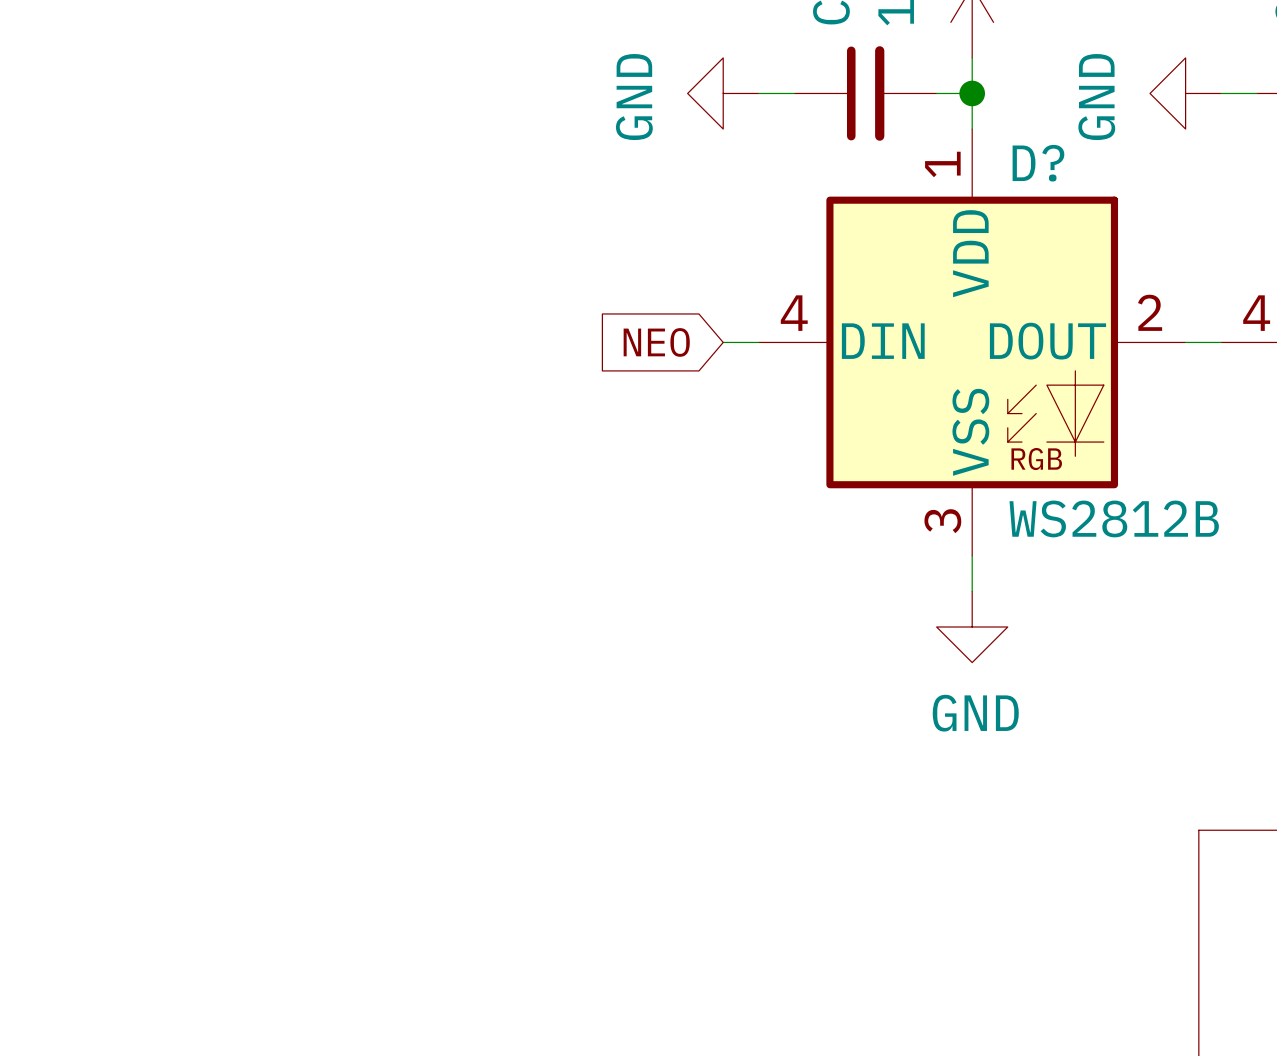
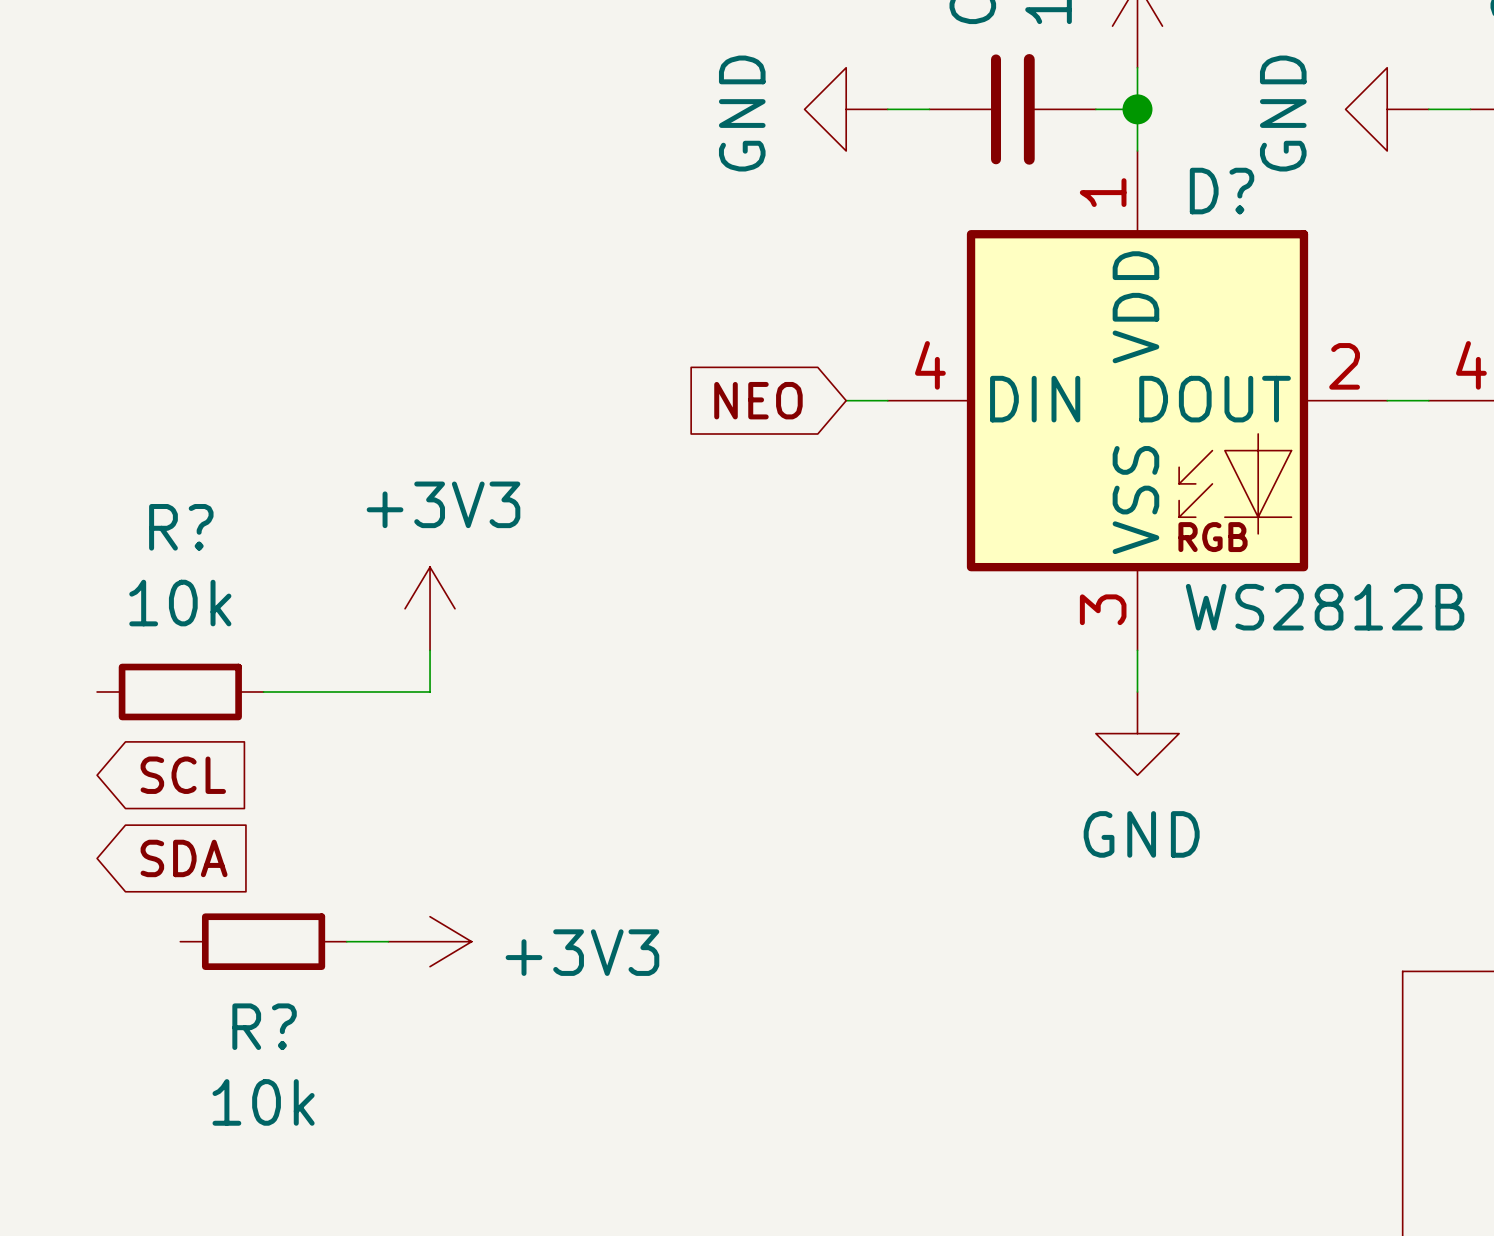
power symbol: none -> +3V3 (430, 608)
wire: none -> (430, 650) (430, 691) (263, 691)
R?: none -> 10k (180, 691)
global label: none -> SCL (183, 775)
global label: none -> SDA (184, 858)
R?: none -> 10k (263, 941)
wire: none -> (346, 941) (388, 941)
power symbol: none -> +3V3 (430, 941)

